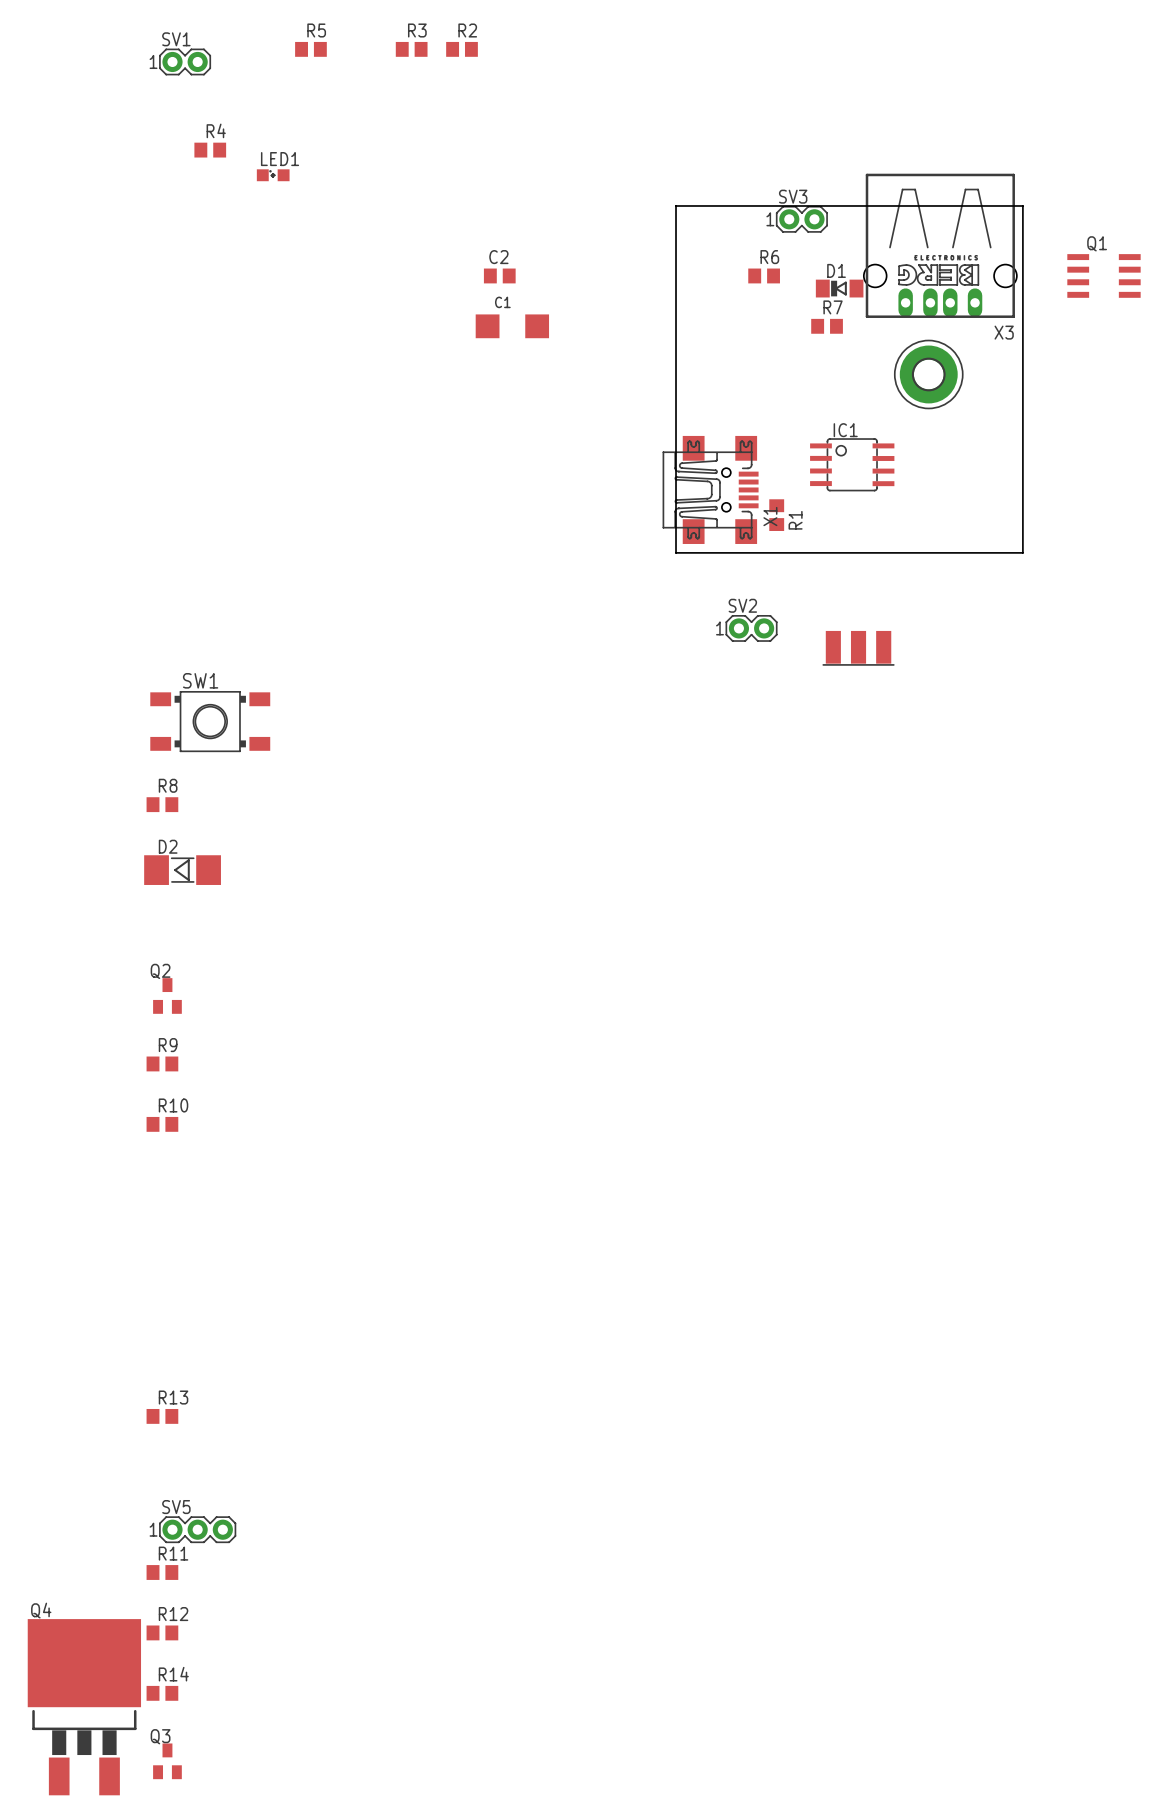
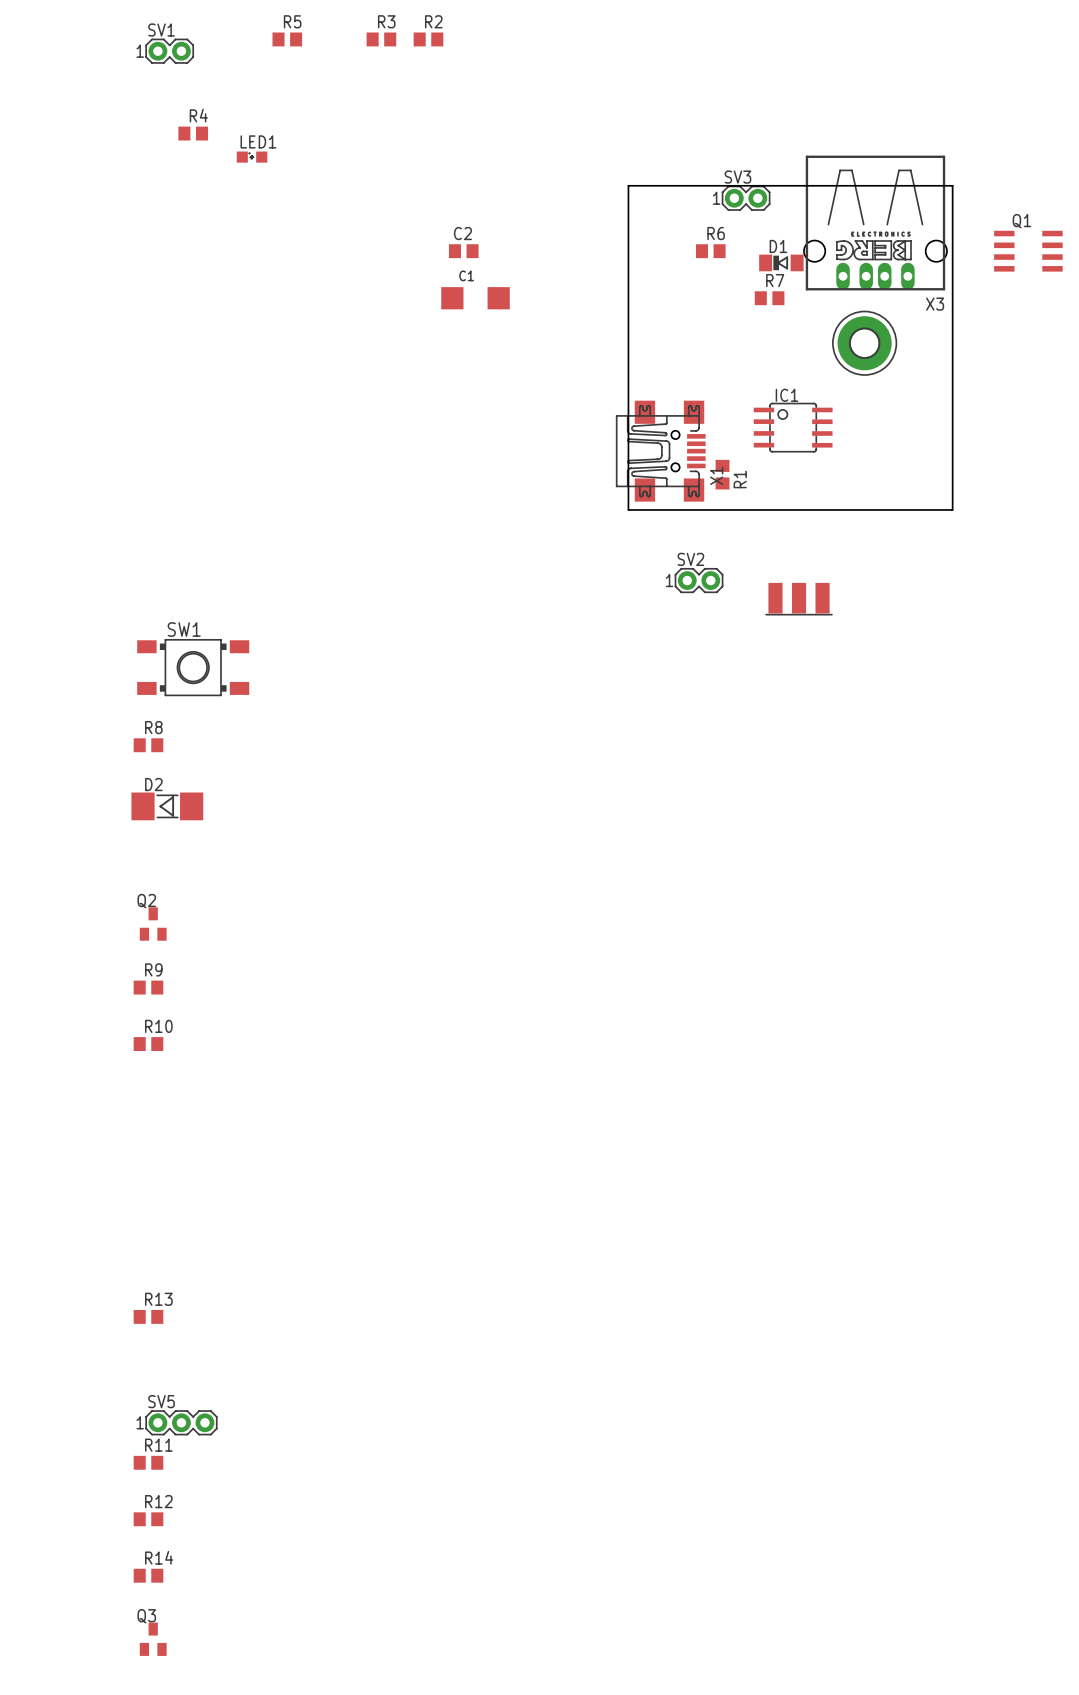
Q4: (84, 1707) -> none

